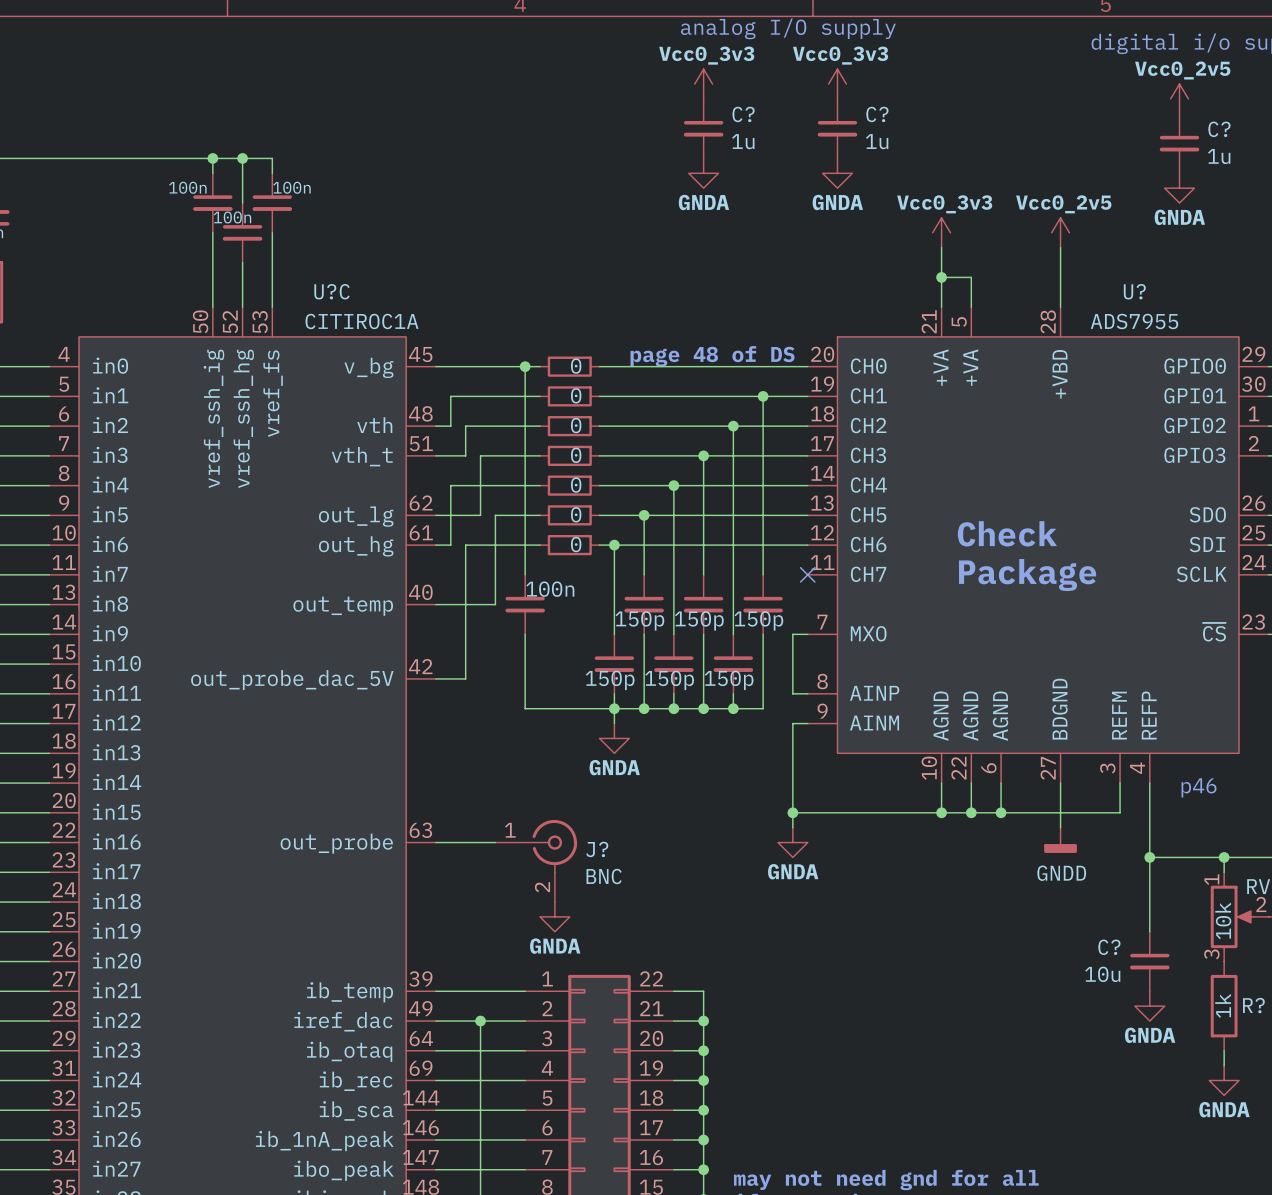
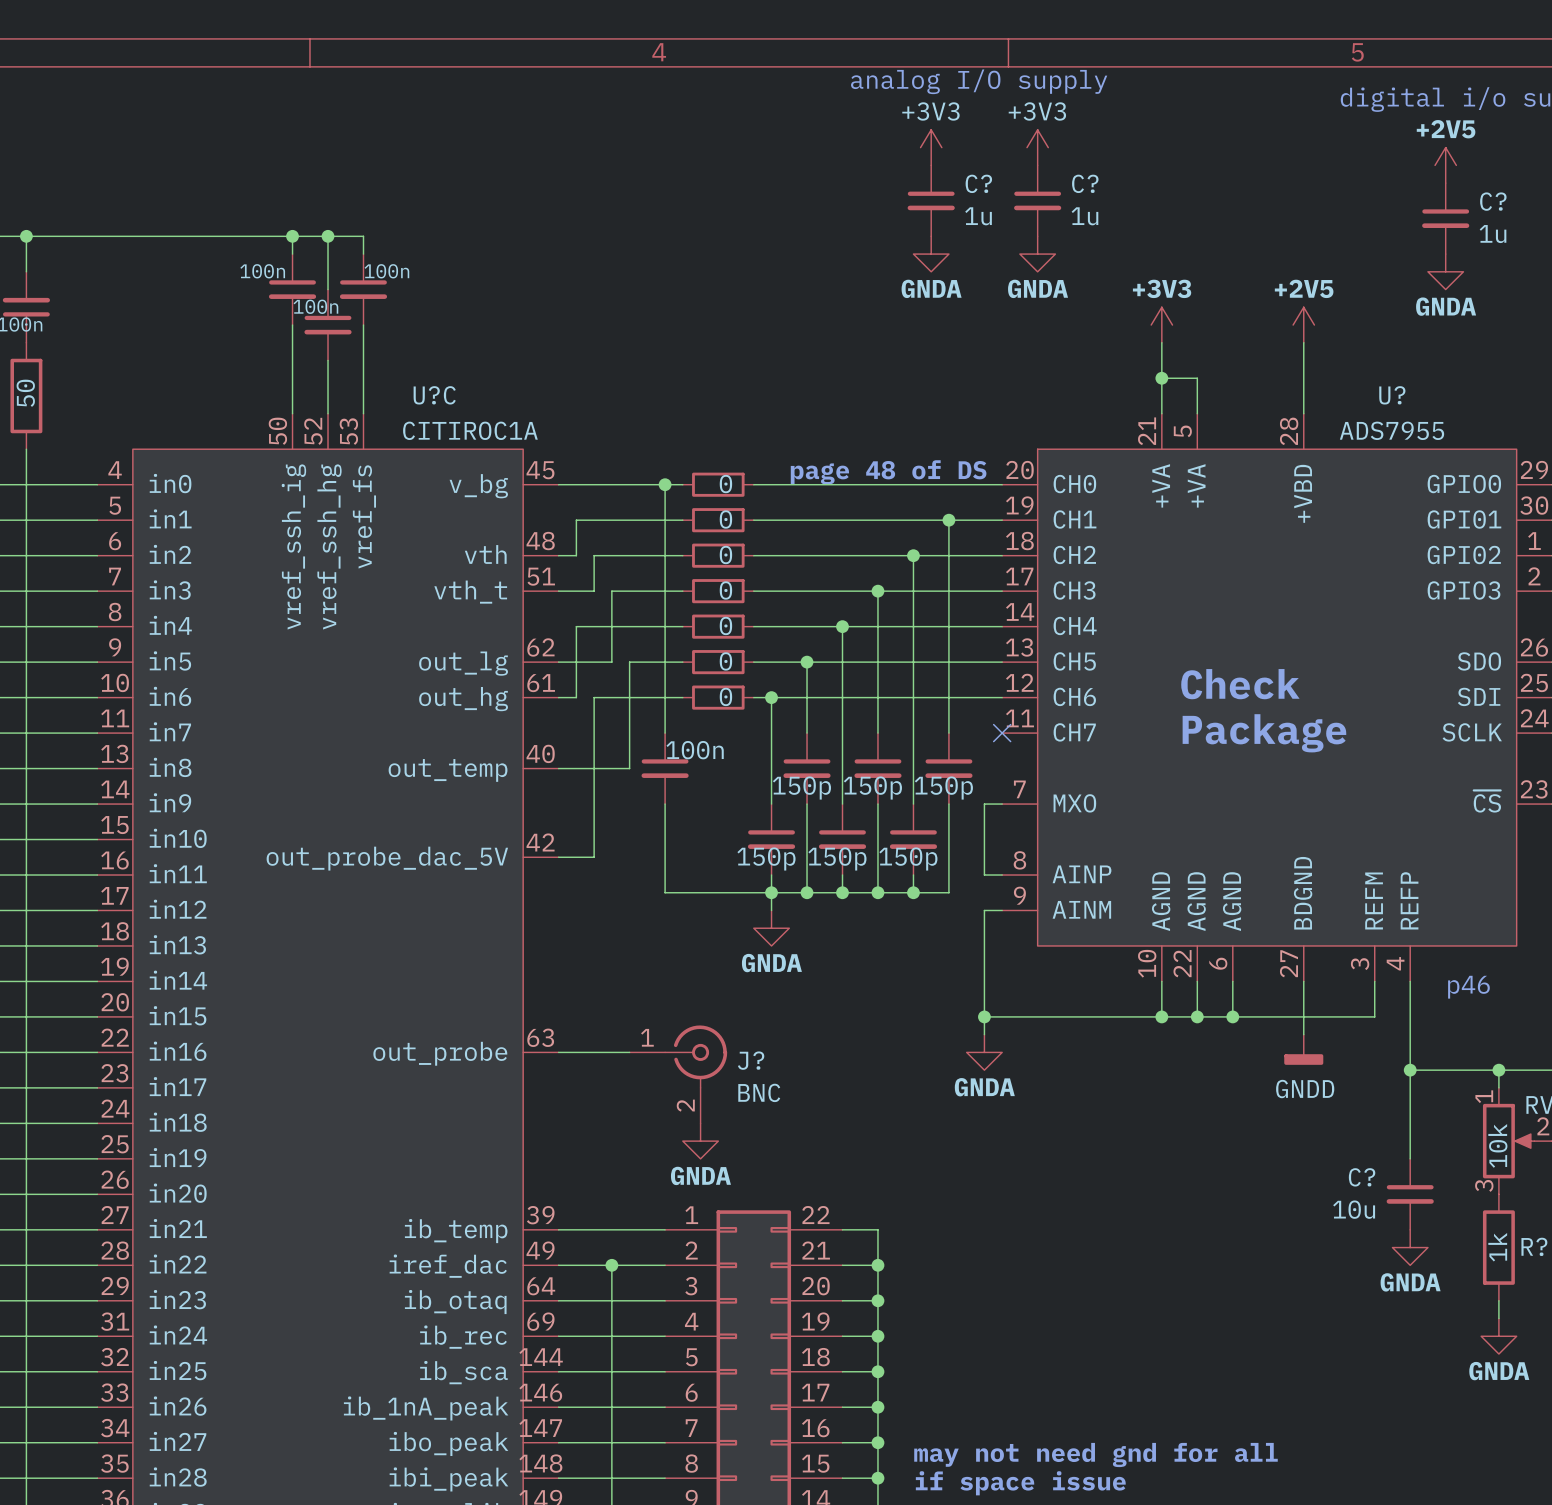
part: Vcc0_3v3 (703, 84) -> none
power symbol: none -> +3V3 (931, 147)
part: Vcc0_3v3 (837, 84) -> none
power symbol: none -> +3V3 (1037, 147)
part: Vcc0_2v5 (1179, 98) -> none
power symbol: none -> +2V5 (1445, 165)
C? position: (703, 128) -> (931, 200)
power symbol position: GNDA (703, 173) -> GNDA (931, 254)
part: Vcc0_3v3 (941, 232) -> none
power symbol: none -> +3V3 (1161, 325)
part: Vcc0_2v5 (1060, 232) -> none
power symbol: none -> +2V5 (1303, 325)

